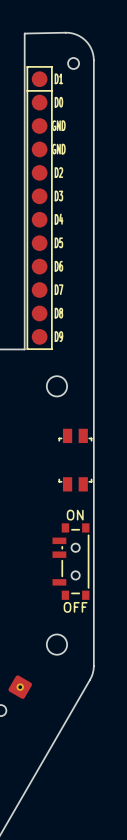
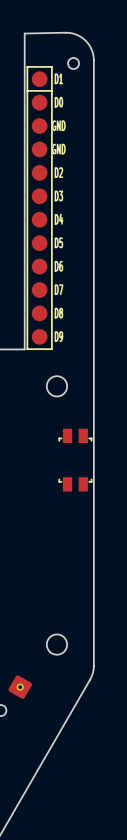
part: (70, 561) -> none

